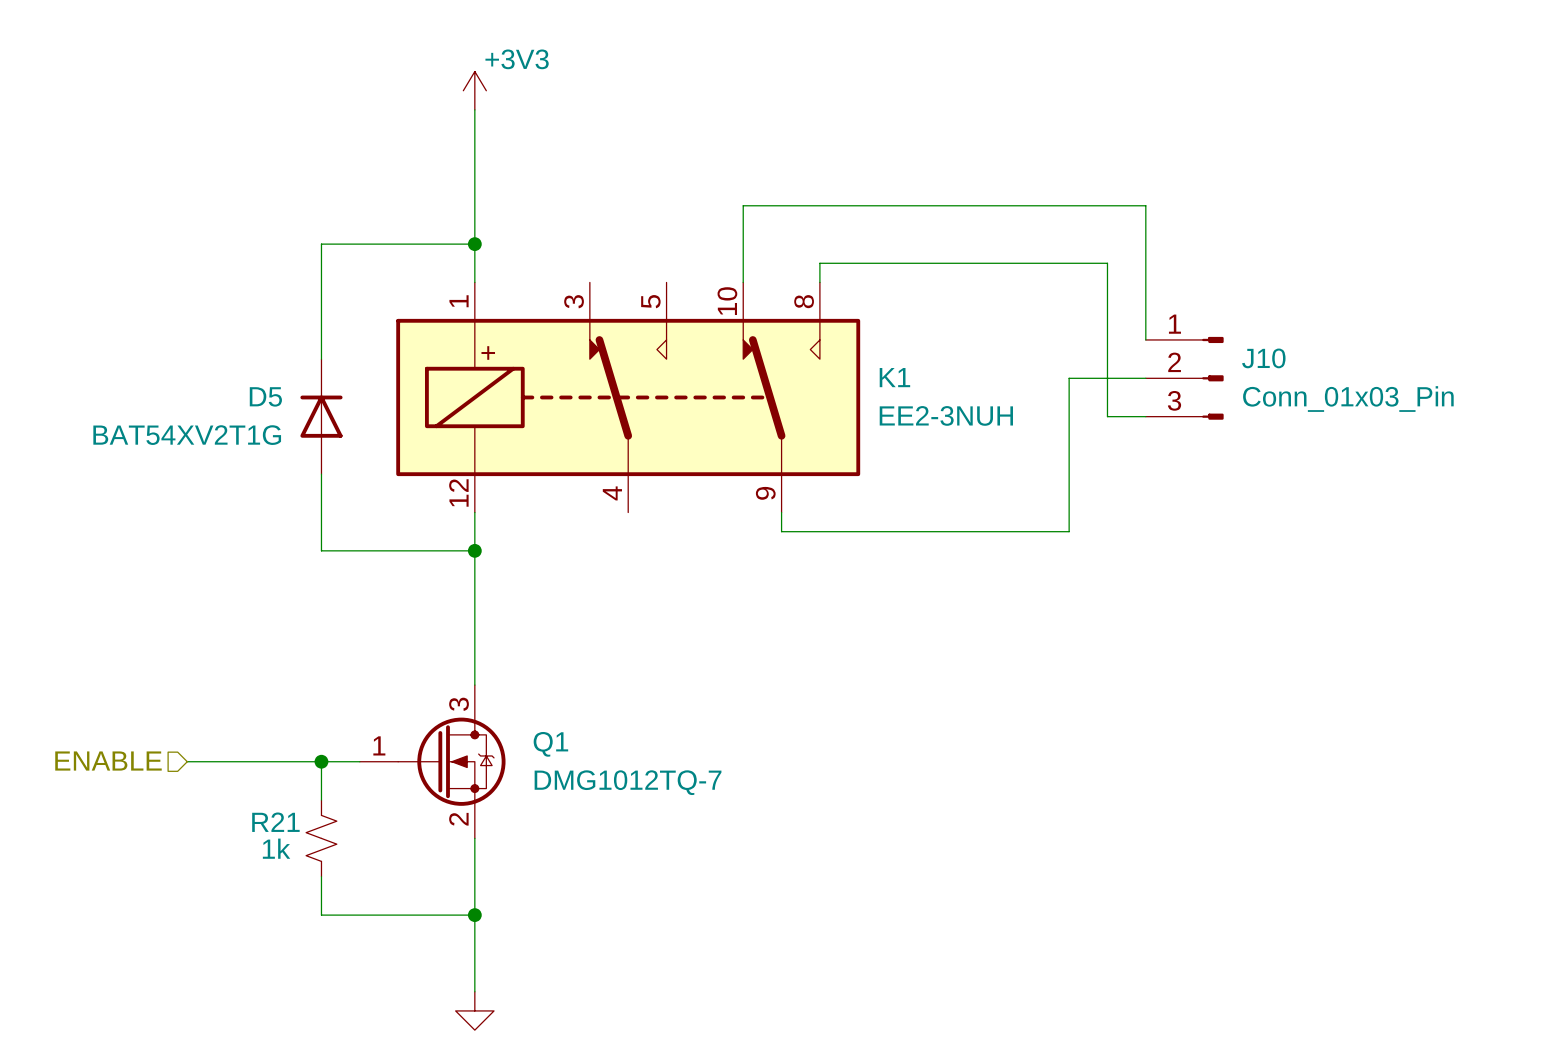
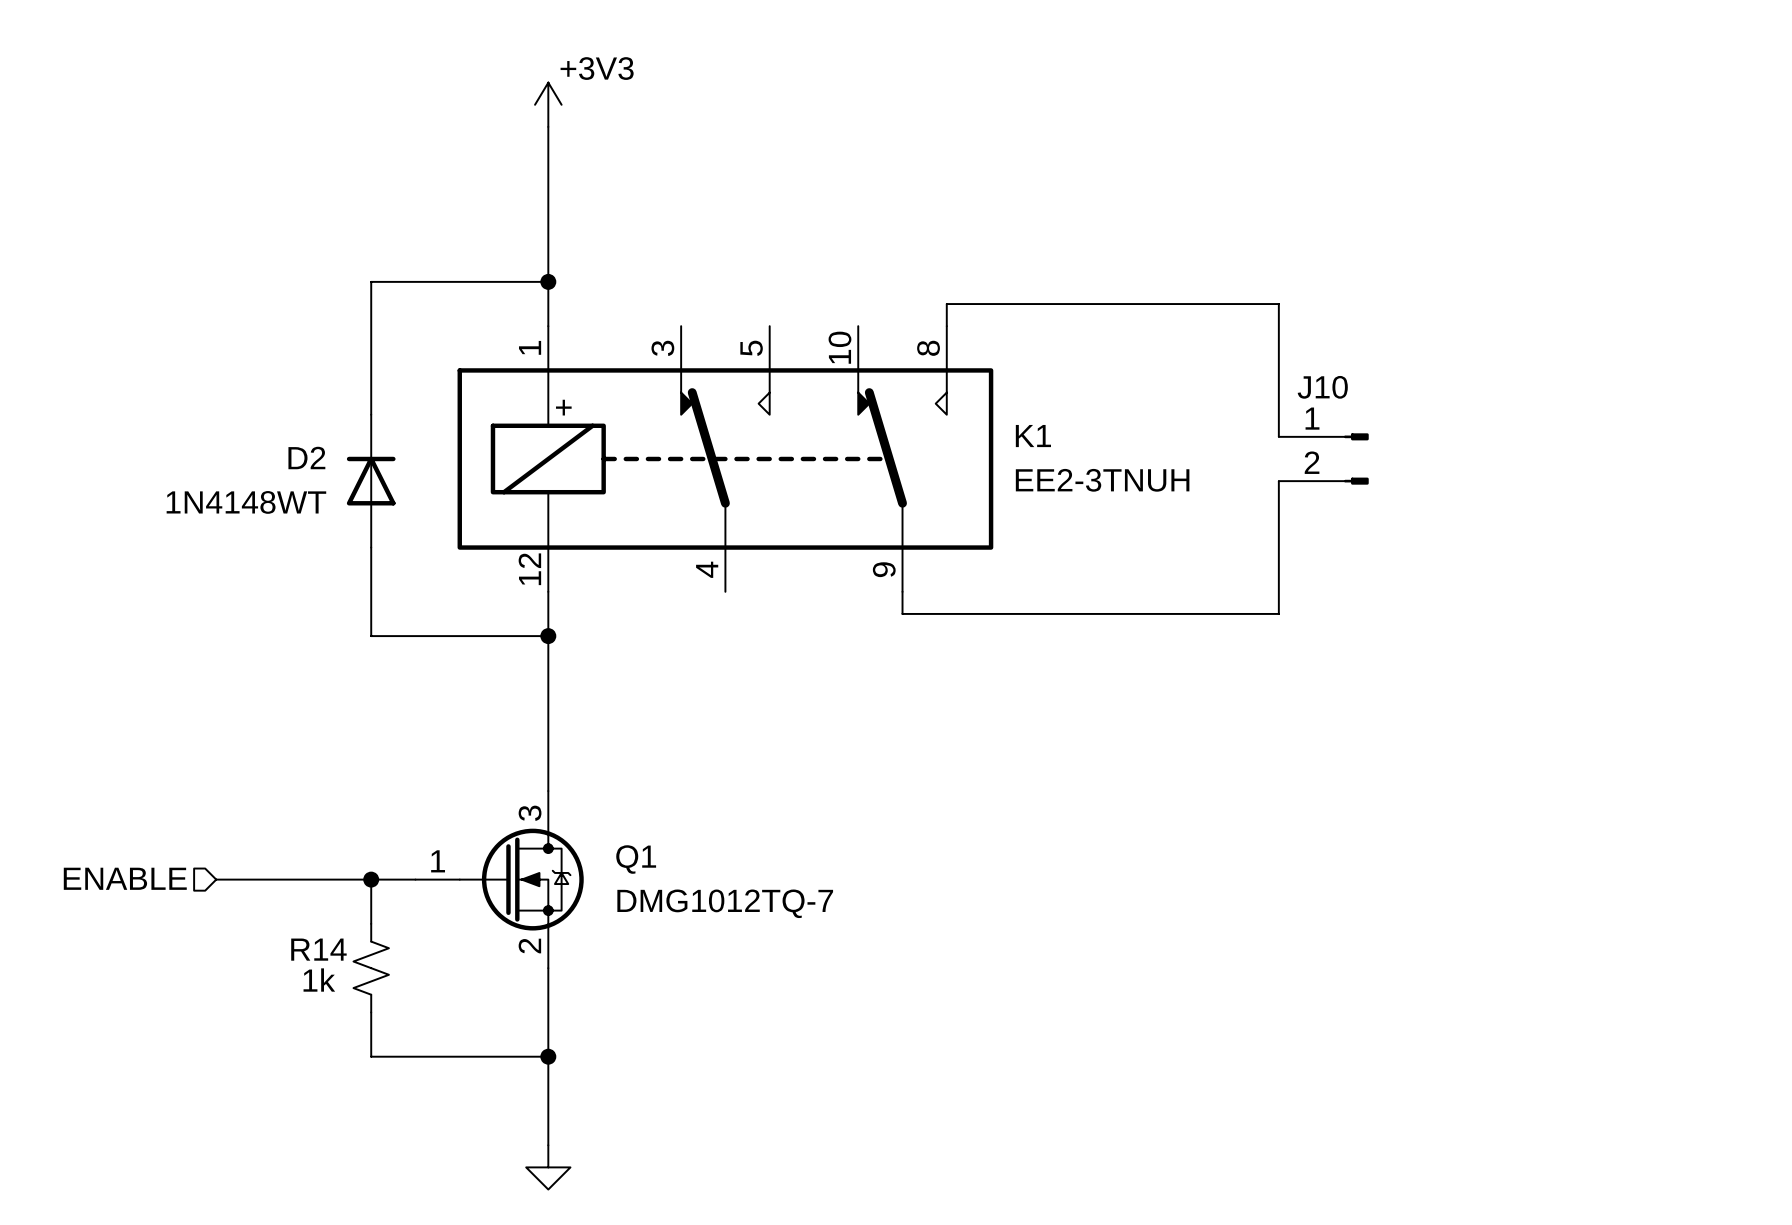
wire: (743, 282) (743, 205) (1145, 205) (1145, 339) -> none
J10 symbol: [1145, 336, 1224, 420] -> [1278, 433, 1369, 485]
J10 name position: J10 (1263, 358) -> J10 (1322, 387)
wire: (1107, 378) (1107, 416) (1145, 416) -> none
wire: (1145, 378) (1069, 378) (1069, 531) -> (1278, 481) (1278, 613) (1234, 613)
D5 name: D5 (265, 396) -> D2 (306, 458)
J10 value: Conn_01x03_Pin (1348, 399) -> none
K1 value: EE2-3NUH (946, 415) -> EE2-3TNUH (1102, 480)
D5 value: BAT54XV2T1G (187, 435) -> 1N4148WT (246, 502)
R21 name: R21 (275, 822) -> R14 (318, 949)

